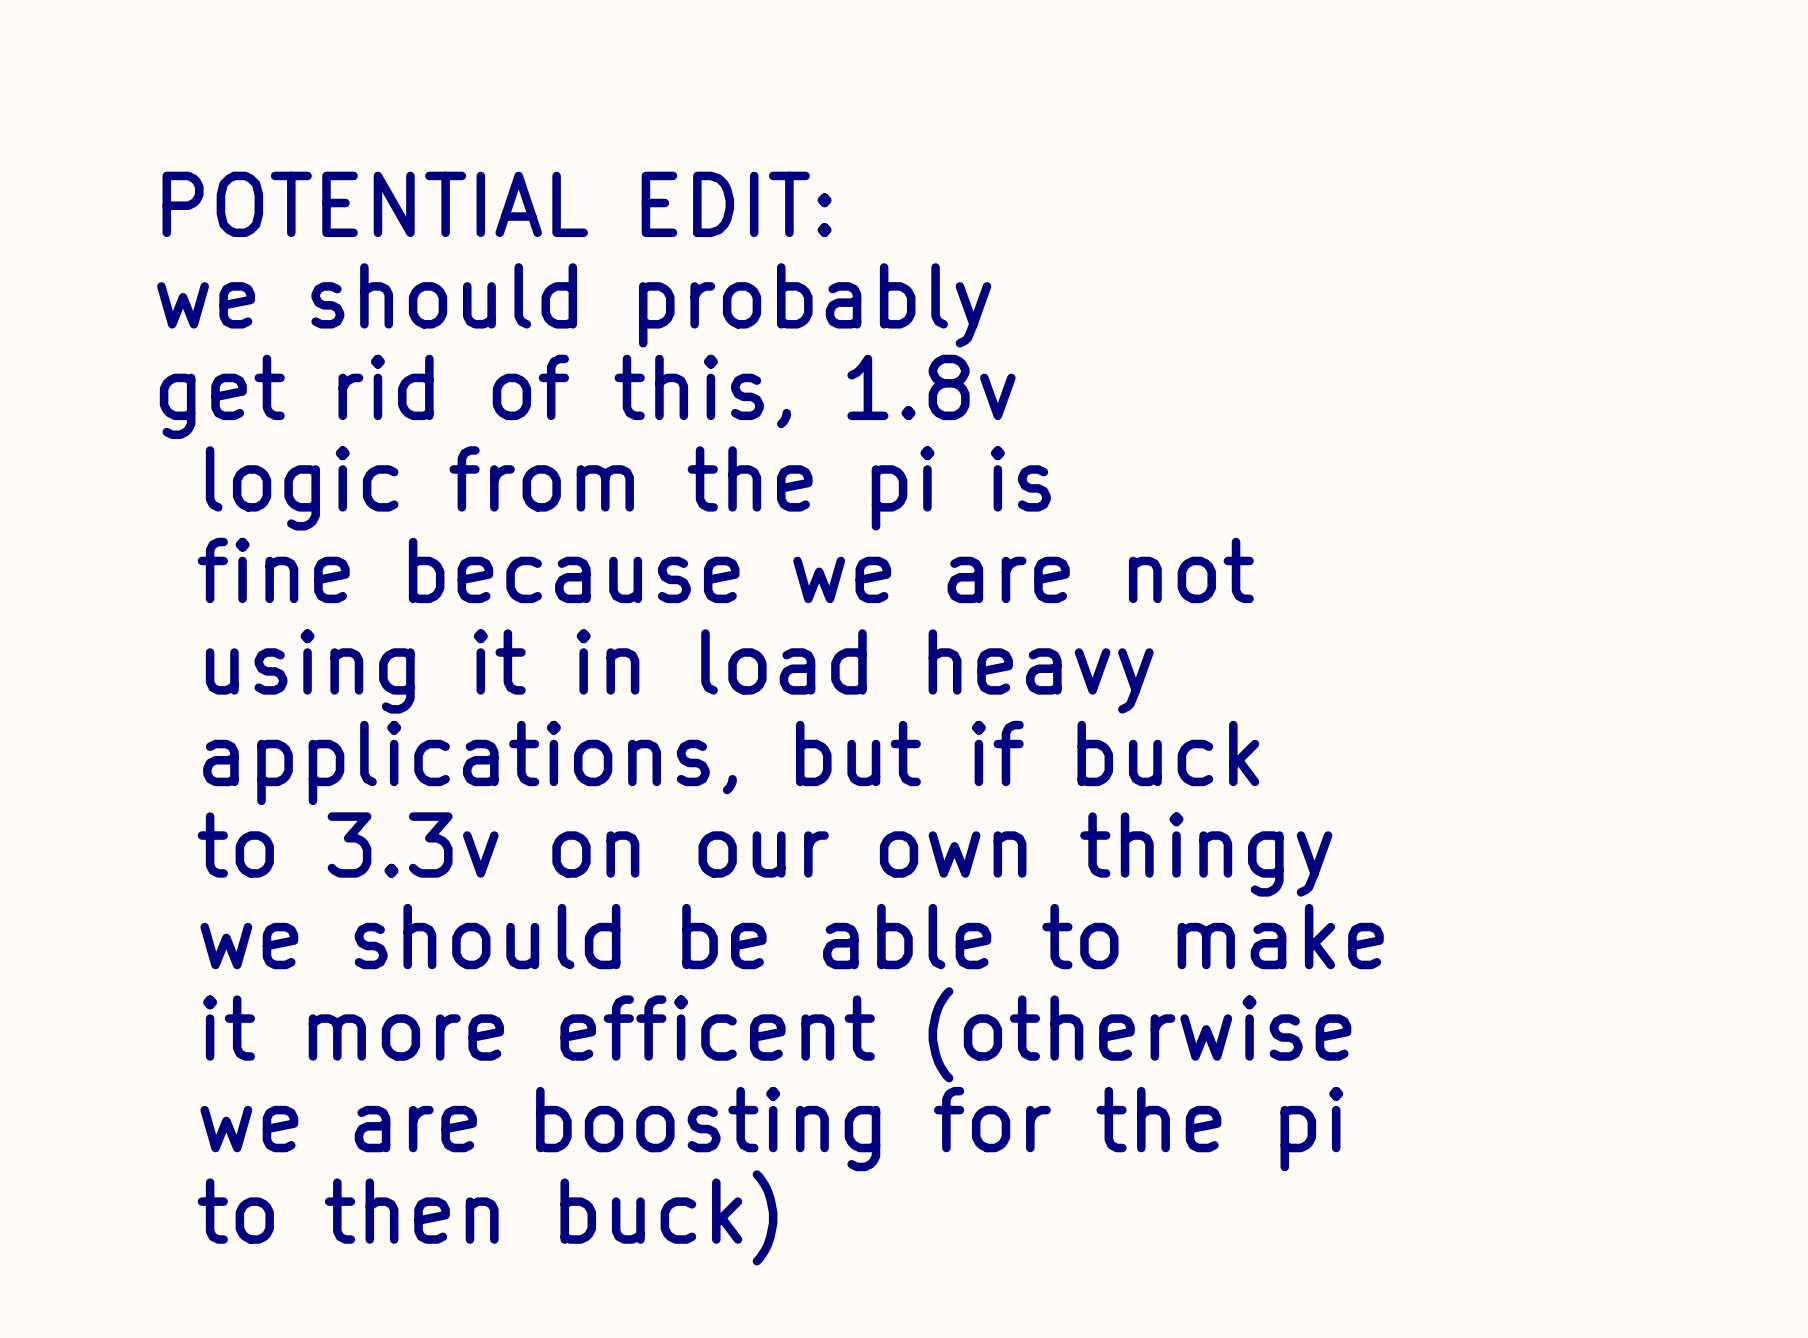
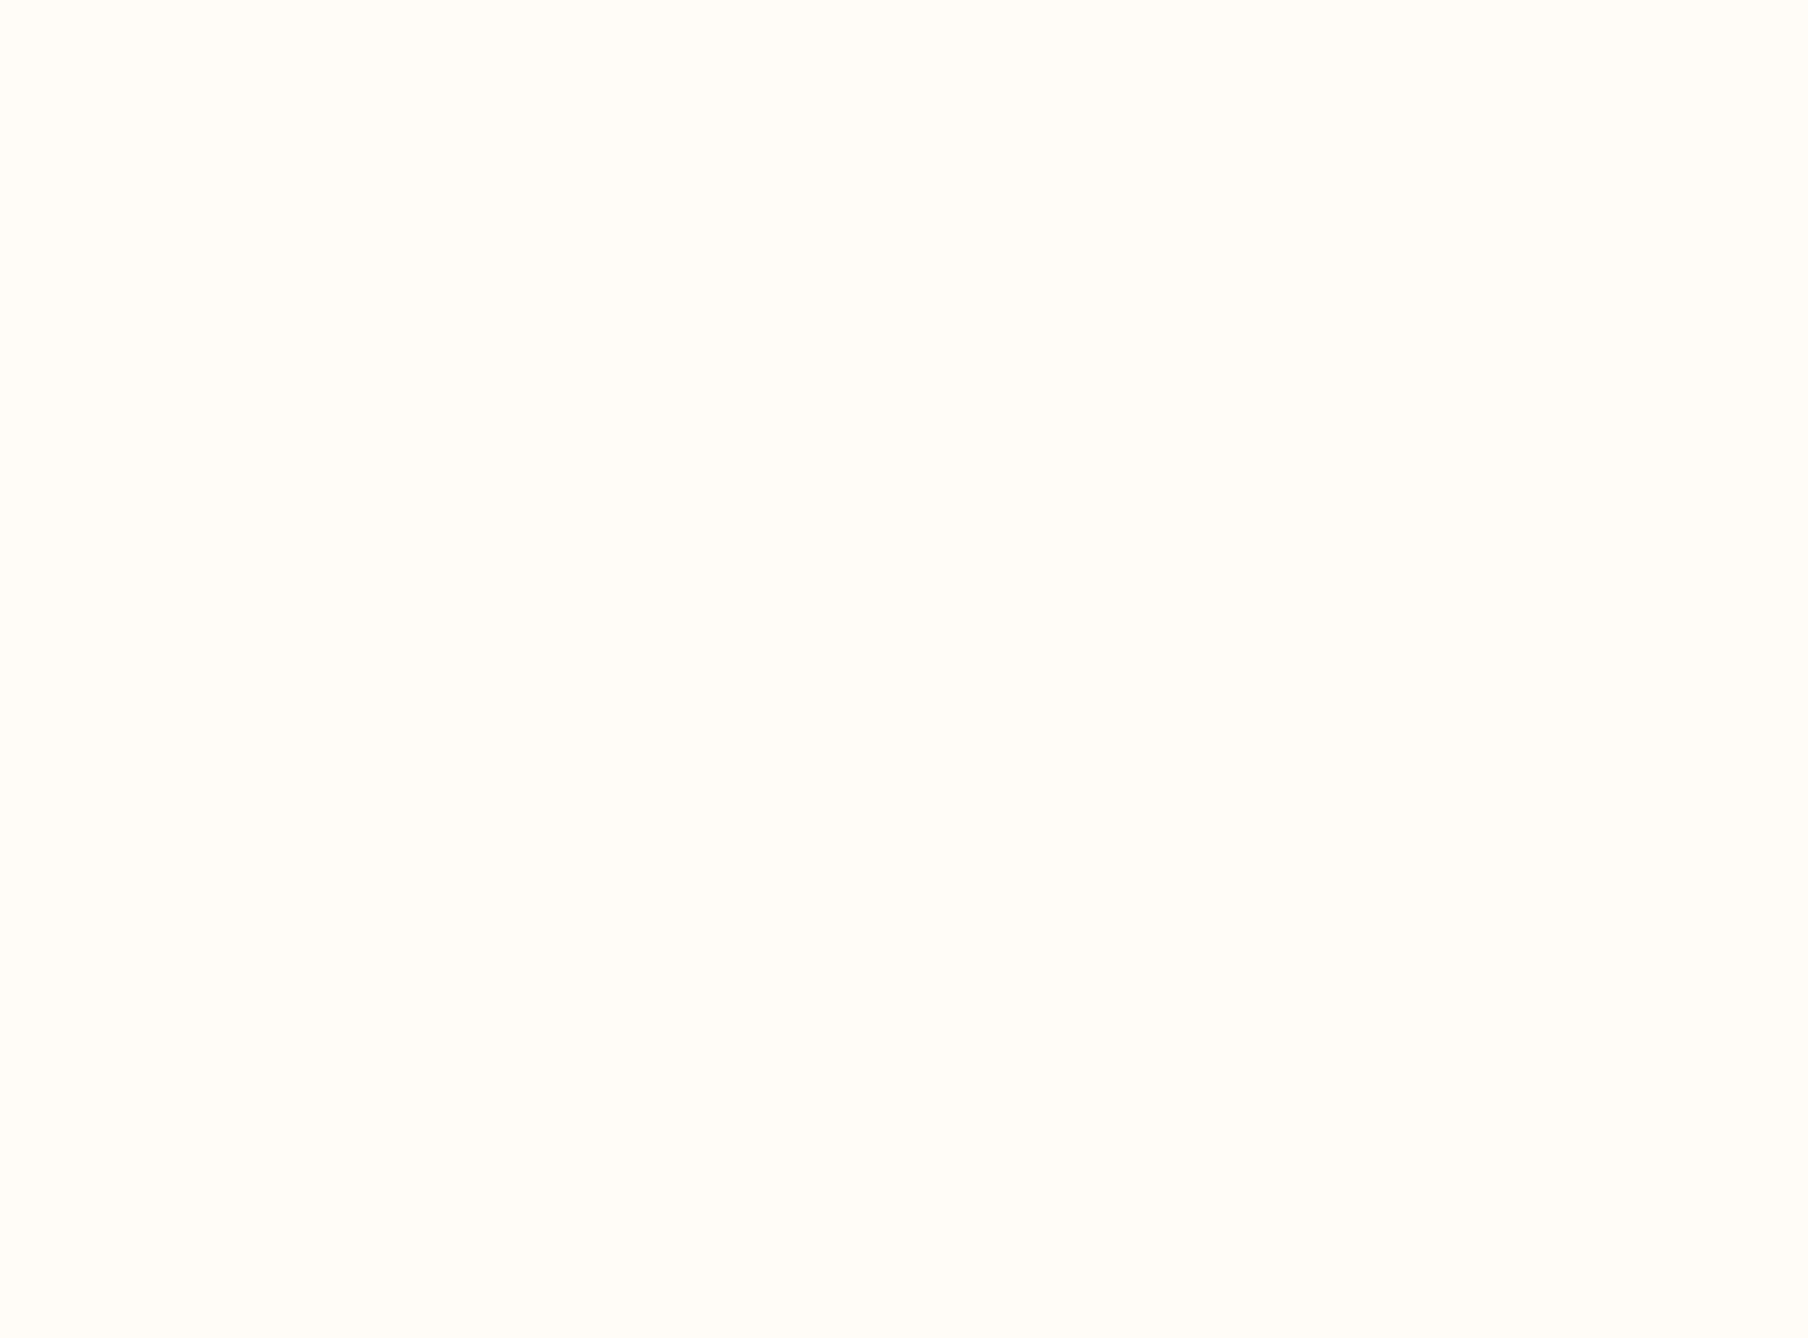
text: POTENTIAL EDIT: (497, 204) -> none
text: we should probably (574, 305) -> none
text: get rid of this, 1.8v (587, 396) -> none
text: logic from the pi is (628, 488) -> none
text: fine because we are not (725, 570) -> none
text: using it in load heavy (679, 671) -> none
text: applications, but if buck (731, 762) -> none
text: to 3.3v on our own thingy (765, 854) -> none
text: we should be able to make (792, 936) -> none
text: it more efficent (otherwise (777, 1034) -> none
text: we are boosting for the pi (771, 1129) -> none
text: to then buck) (487, 1217) -> none

